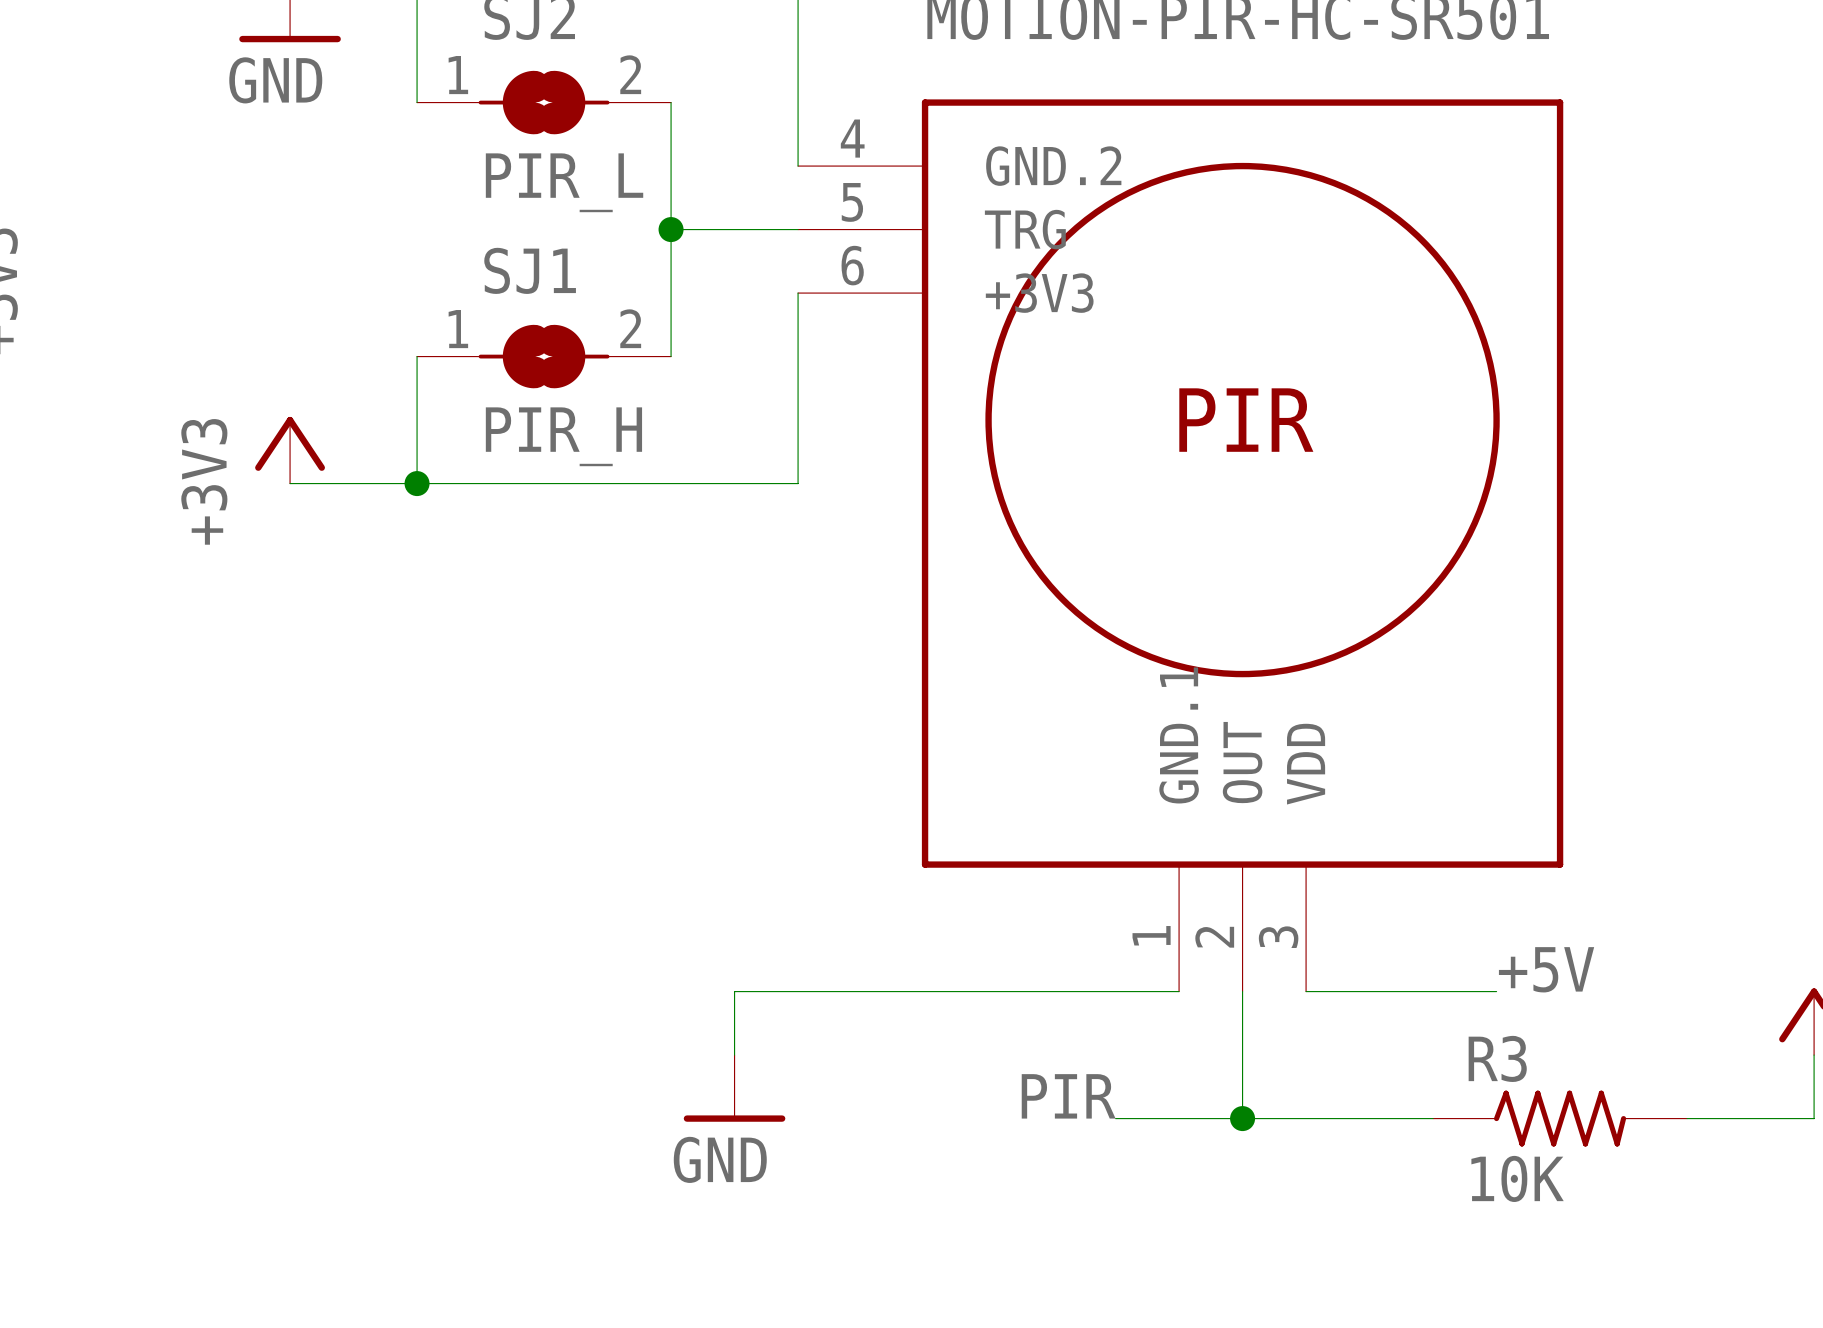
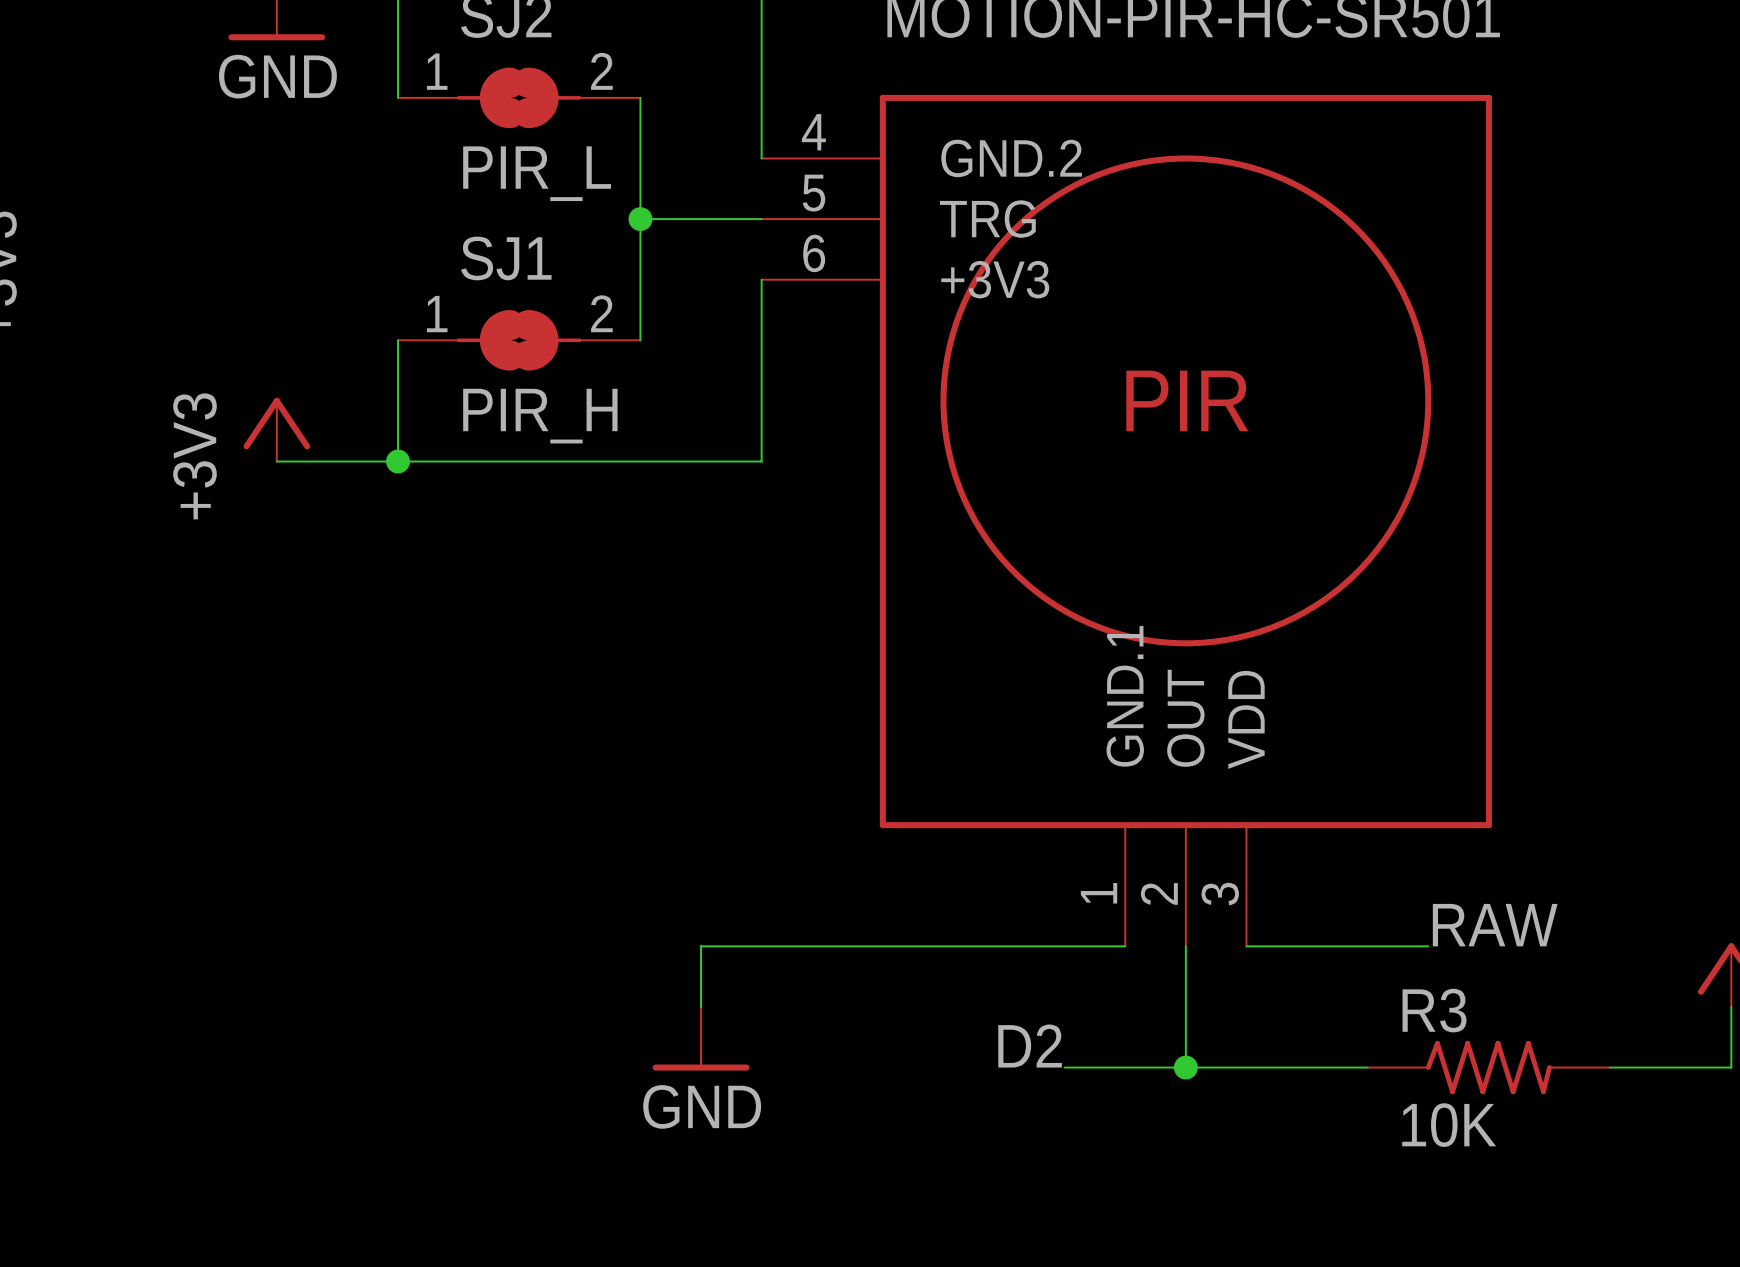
label: +5V (1546, 969) -> RAW (1495, 925)
label: PIR (1068, 1096) -> D2 (1030, 1046)

